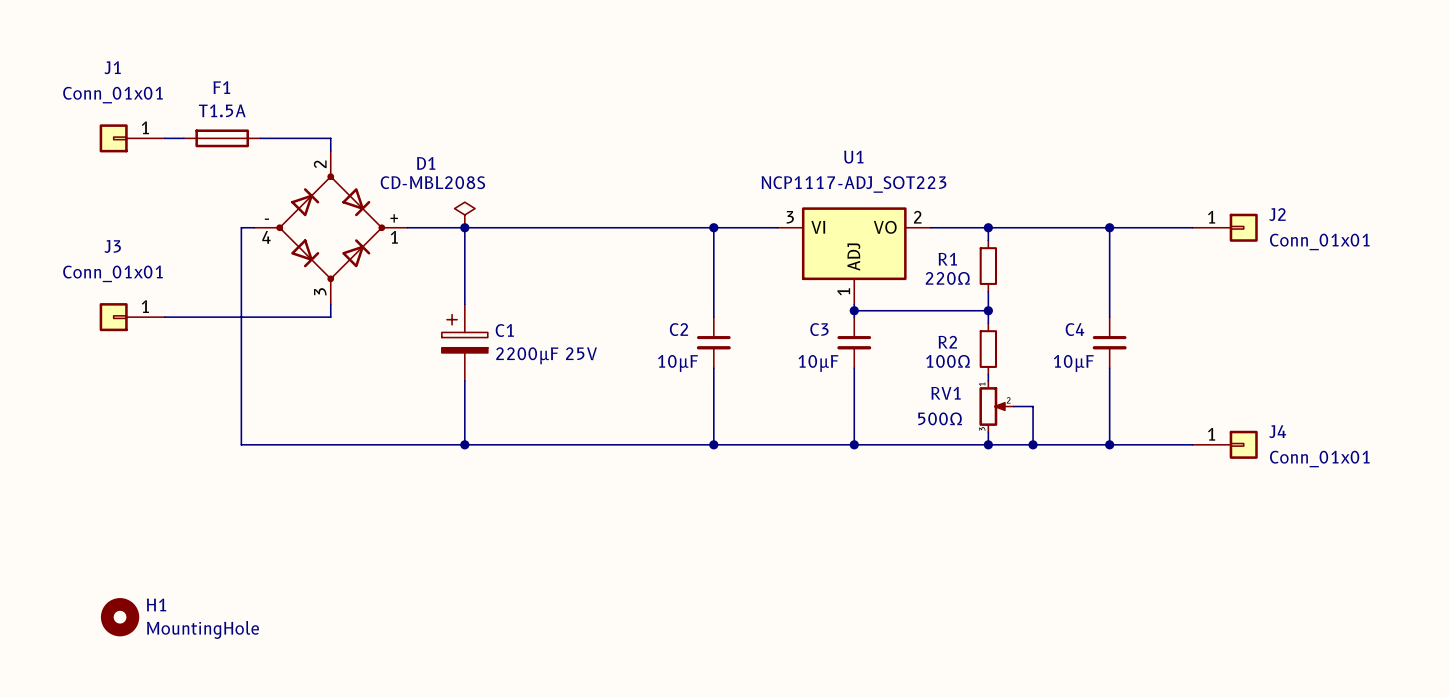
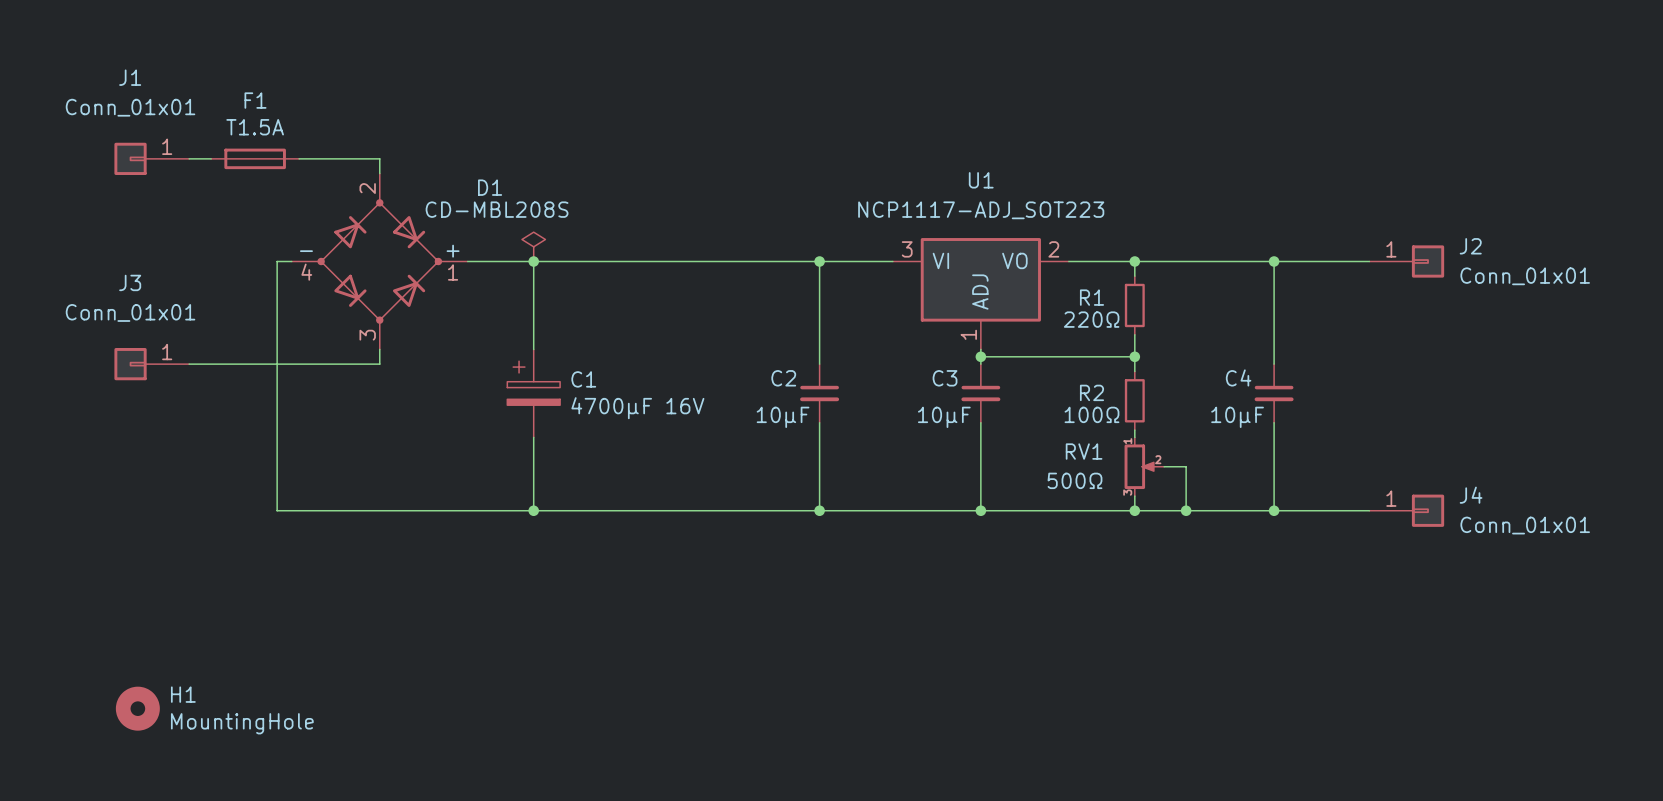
C1 value: 2200µF 25V (546, 355) -> 4700µF 16V (637, 408)

